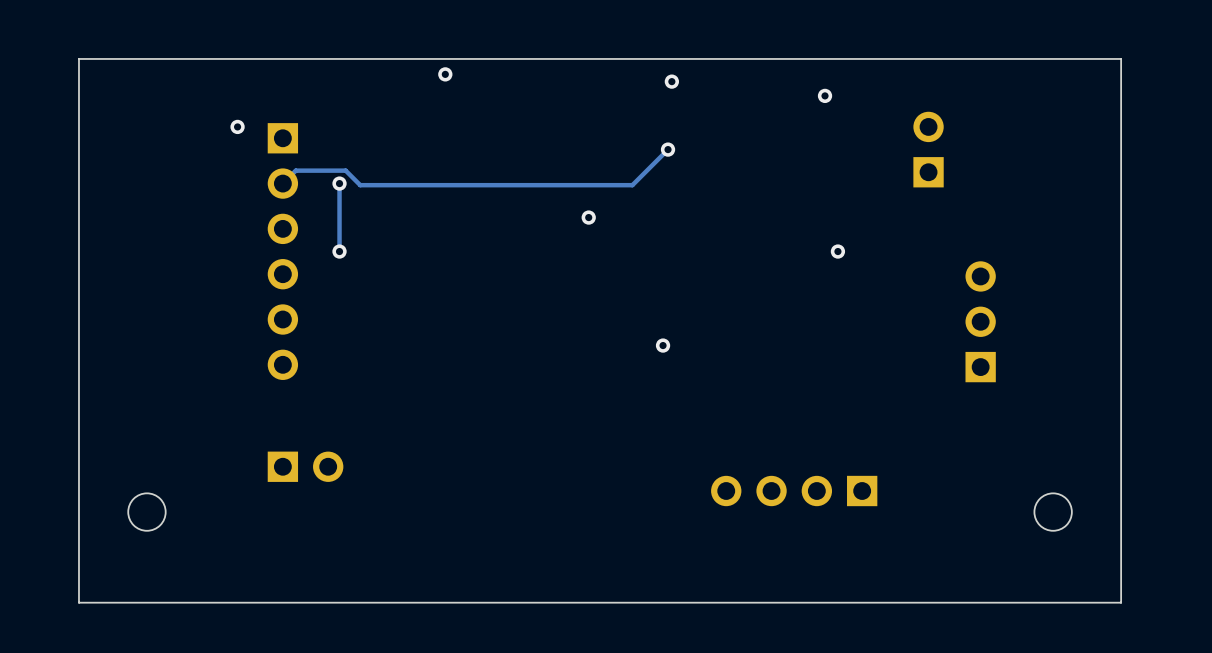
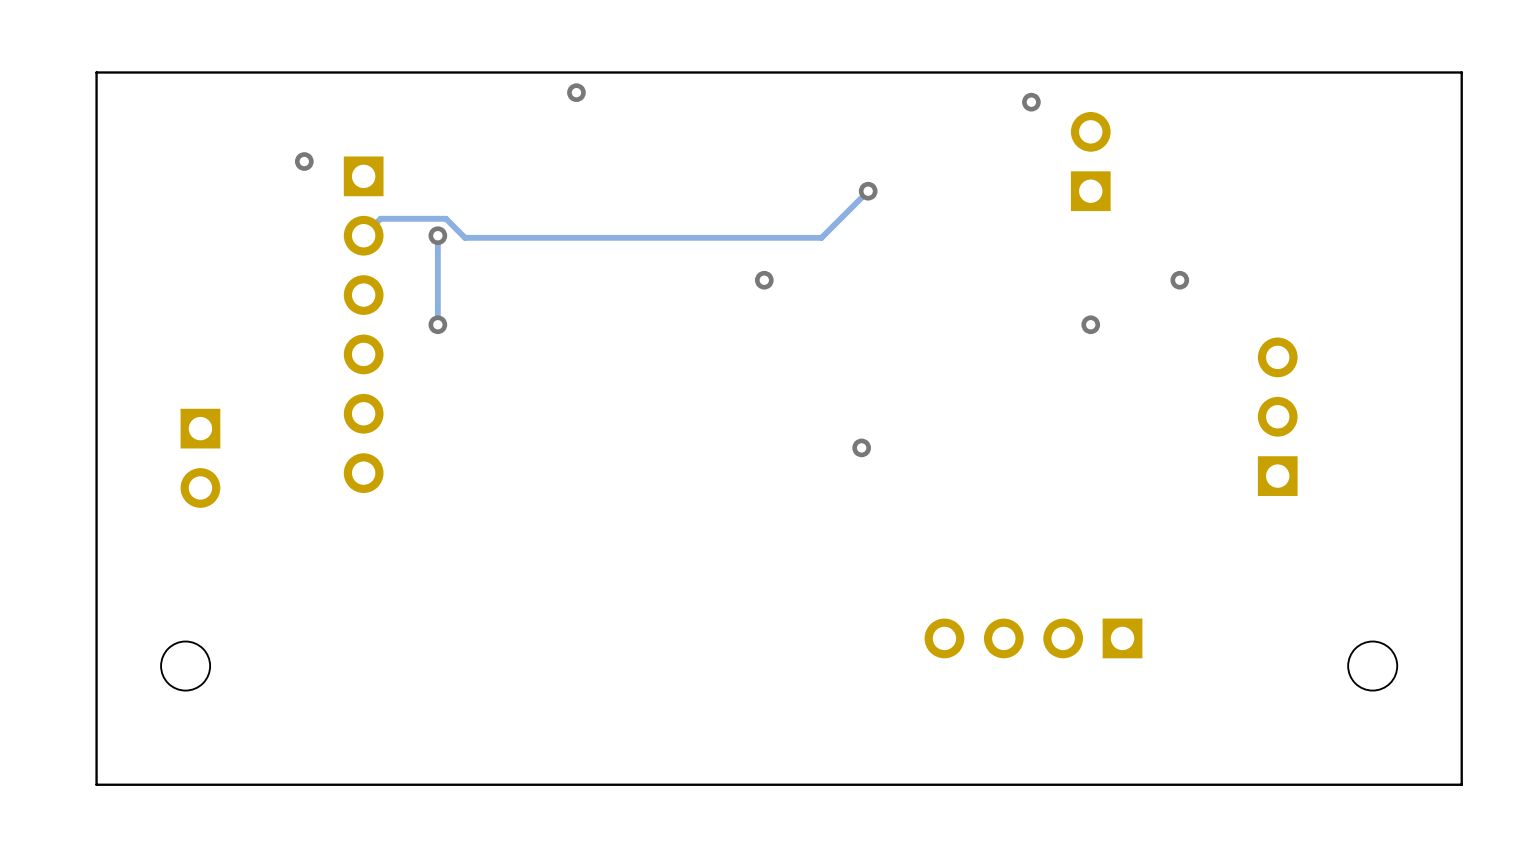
via: (671, 81) -> none
via position: (825, 95) -> (1031, 102)
part position: (928, 149) -> (1090, 161)
via: none -> (1179, 280)
part rotation: 0° (305, 466) -> 90° clockwise (200, 458)
part position: (305, 466) -> (200, 458)

